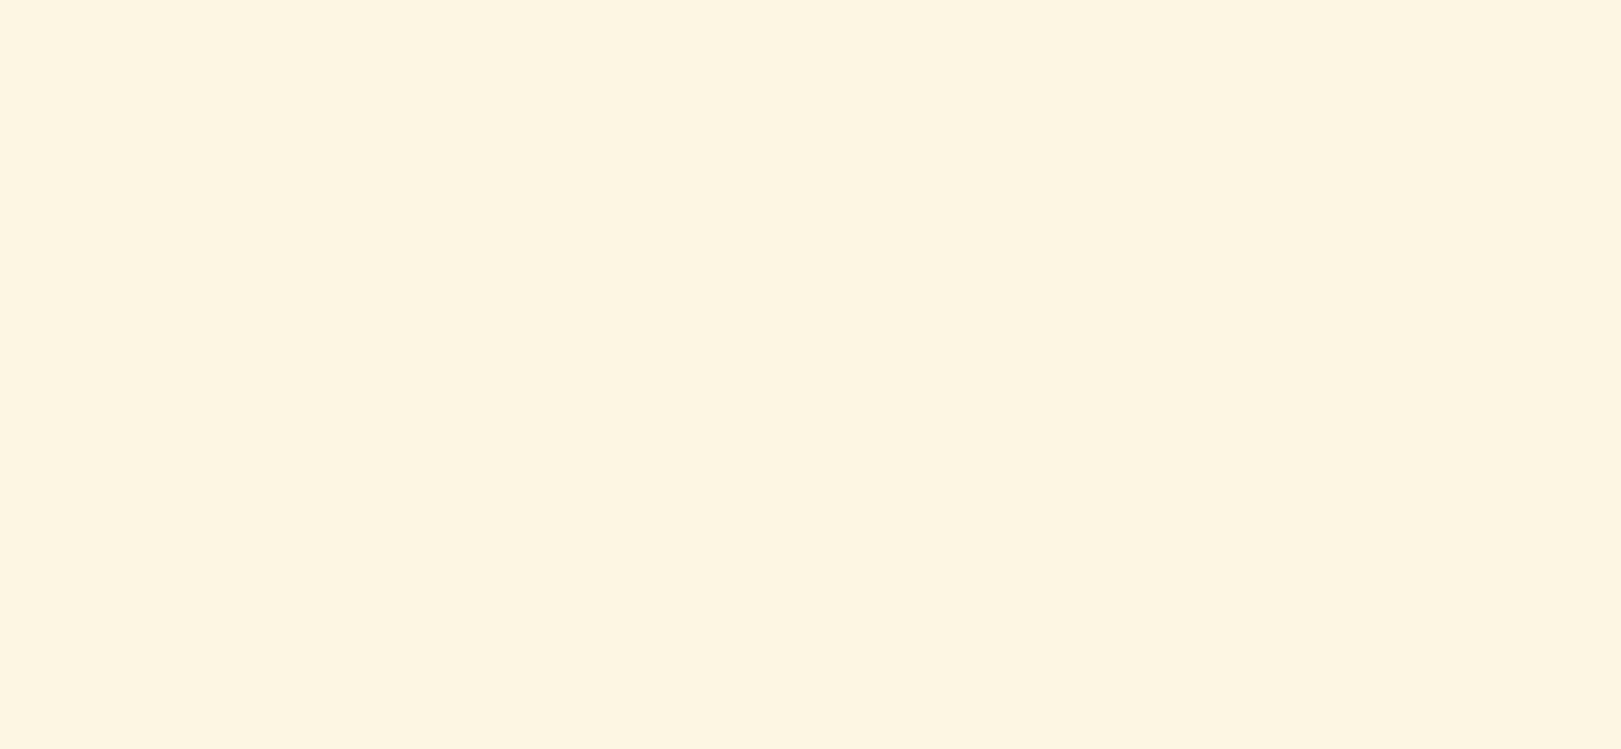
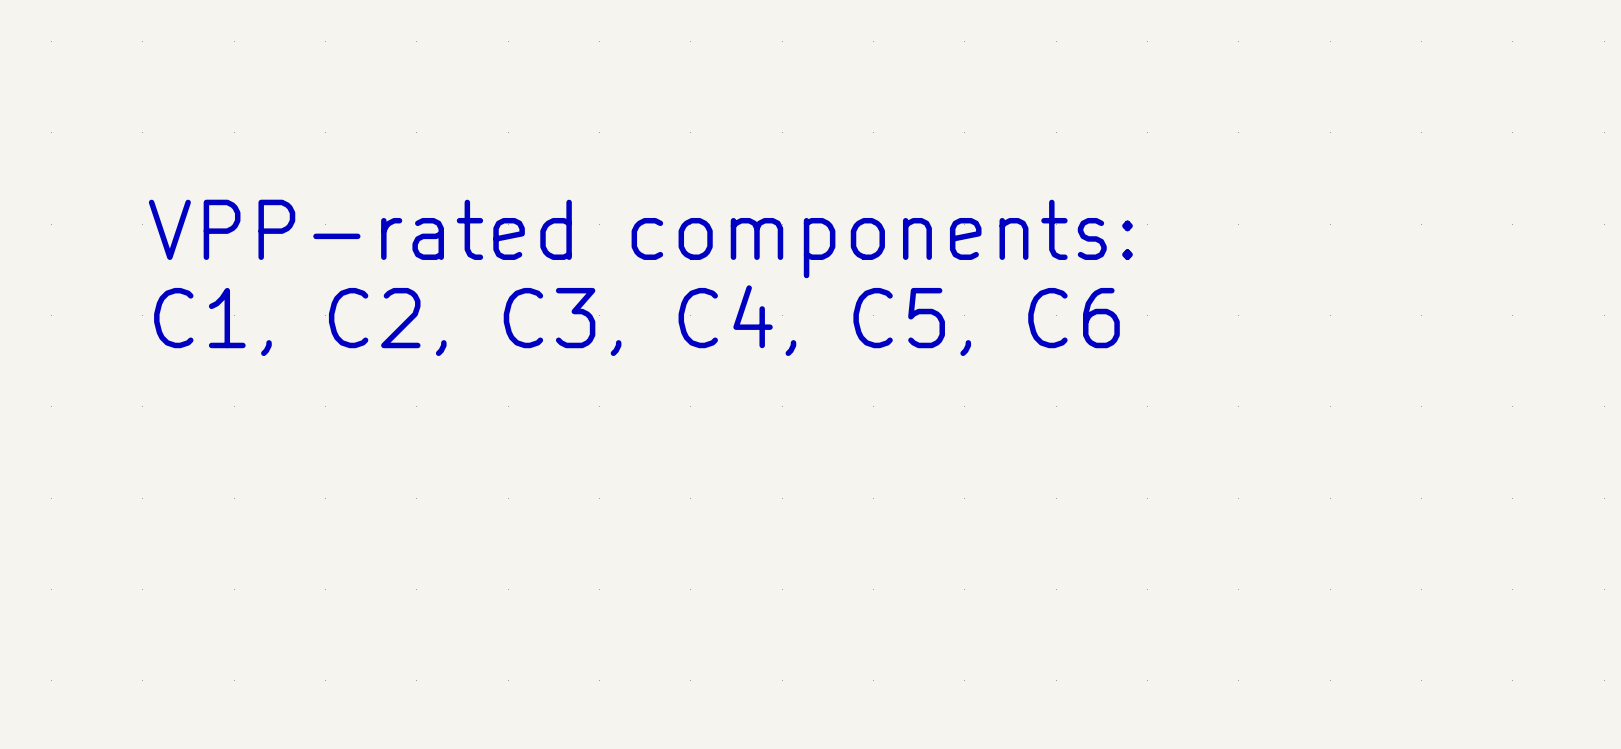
text: none -> VPP-rated components: (640, 238)
text: none -> C1, C2, C3, C4, C5, C6 (636, 320)

